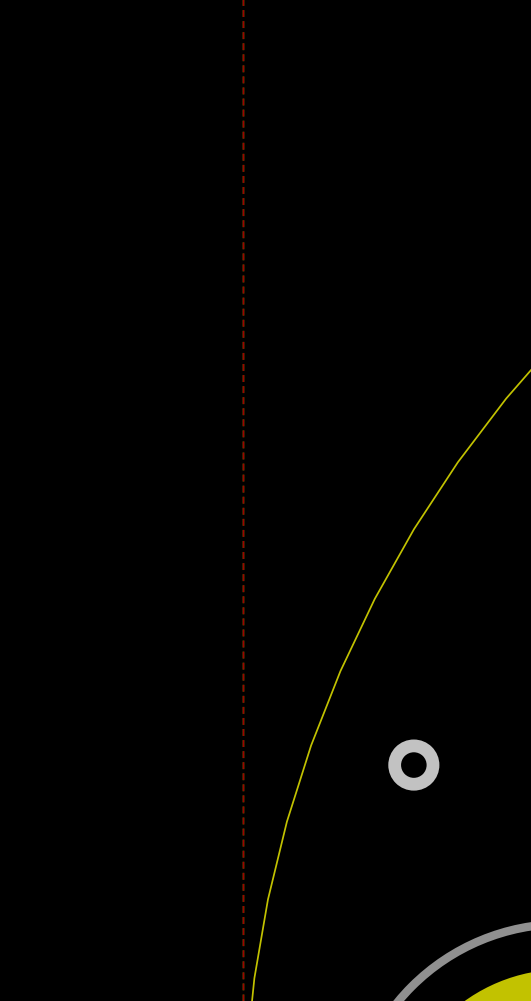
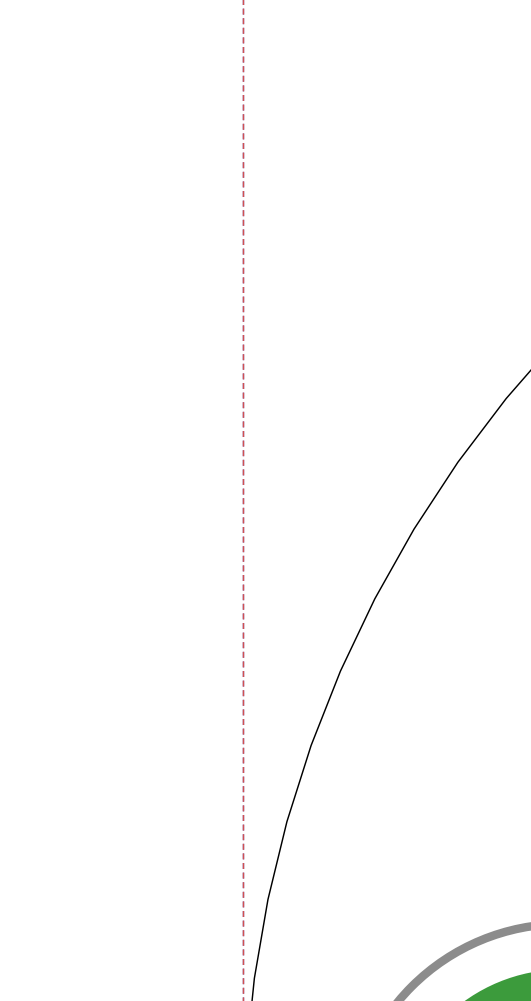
via: (413, 765) -> none

